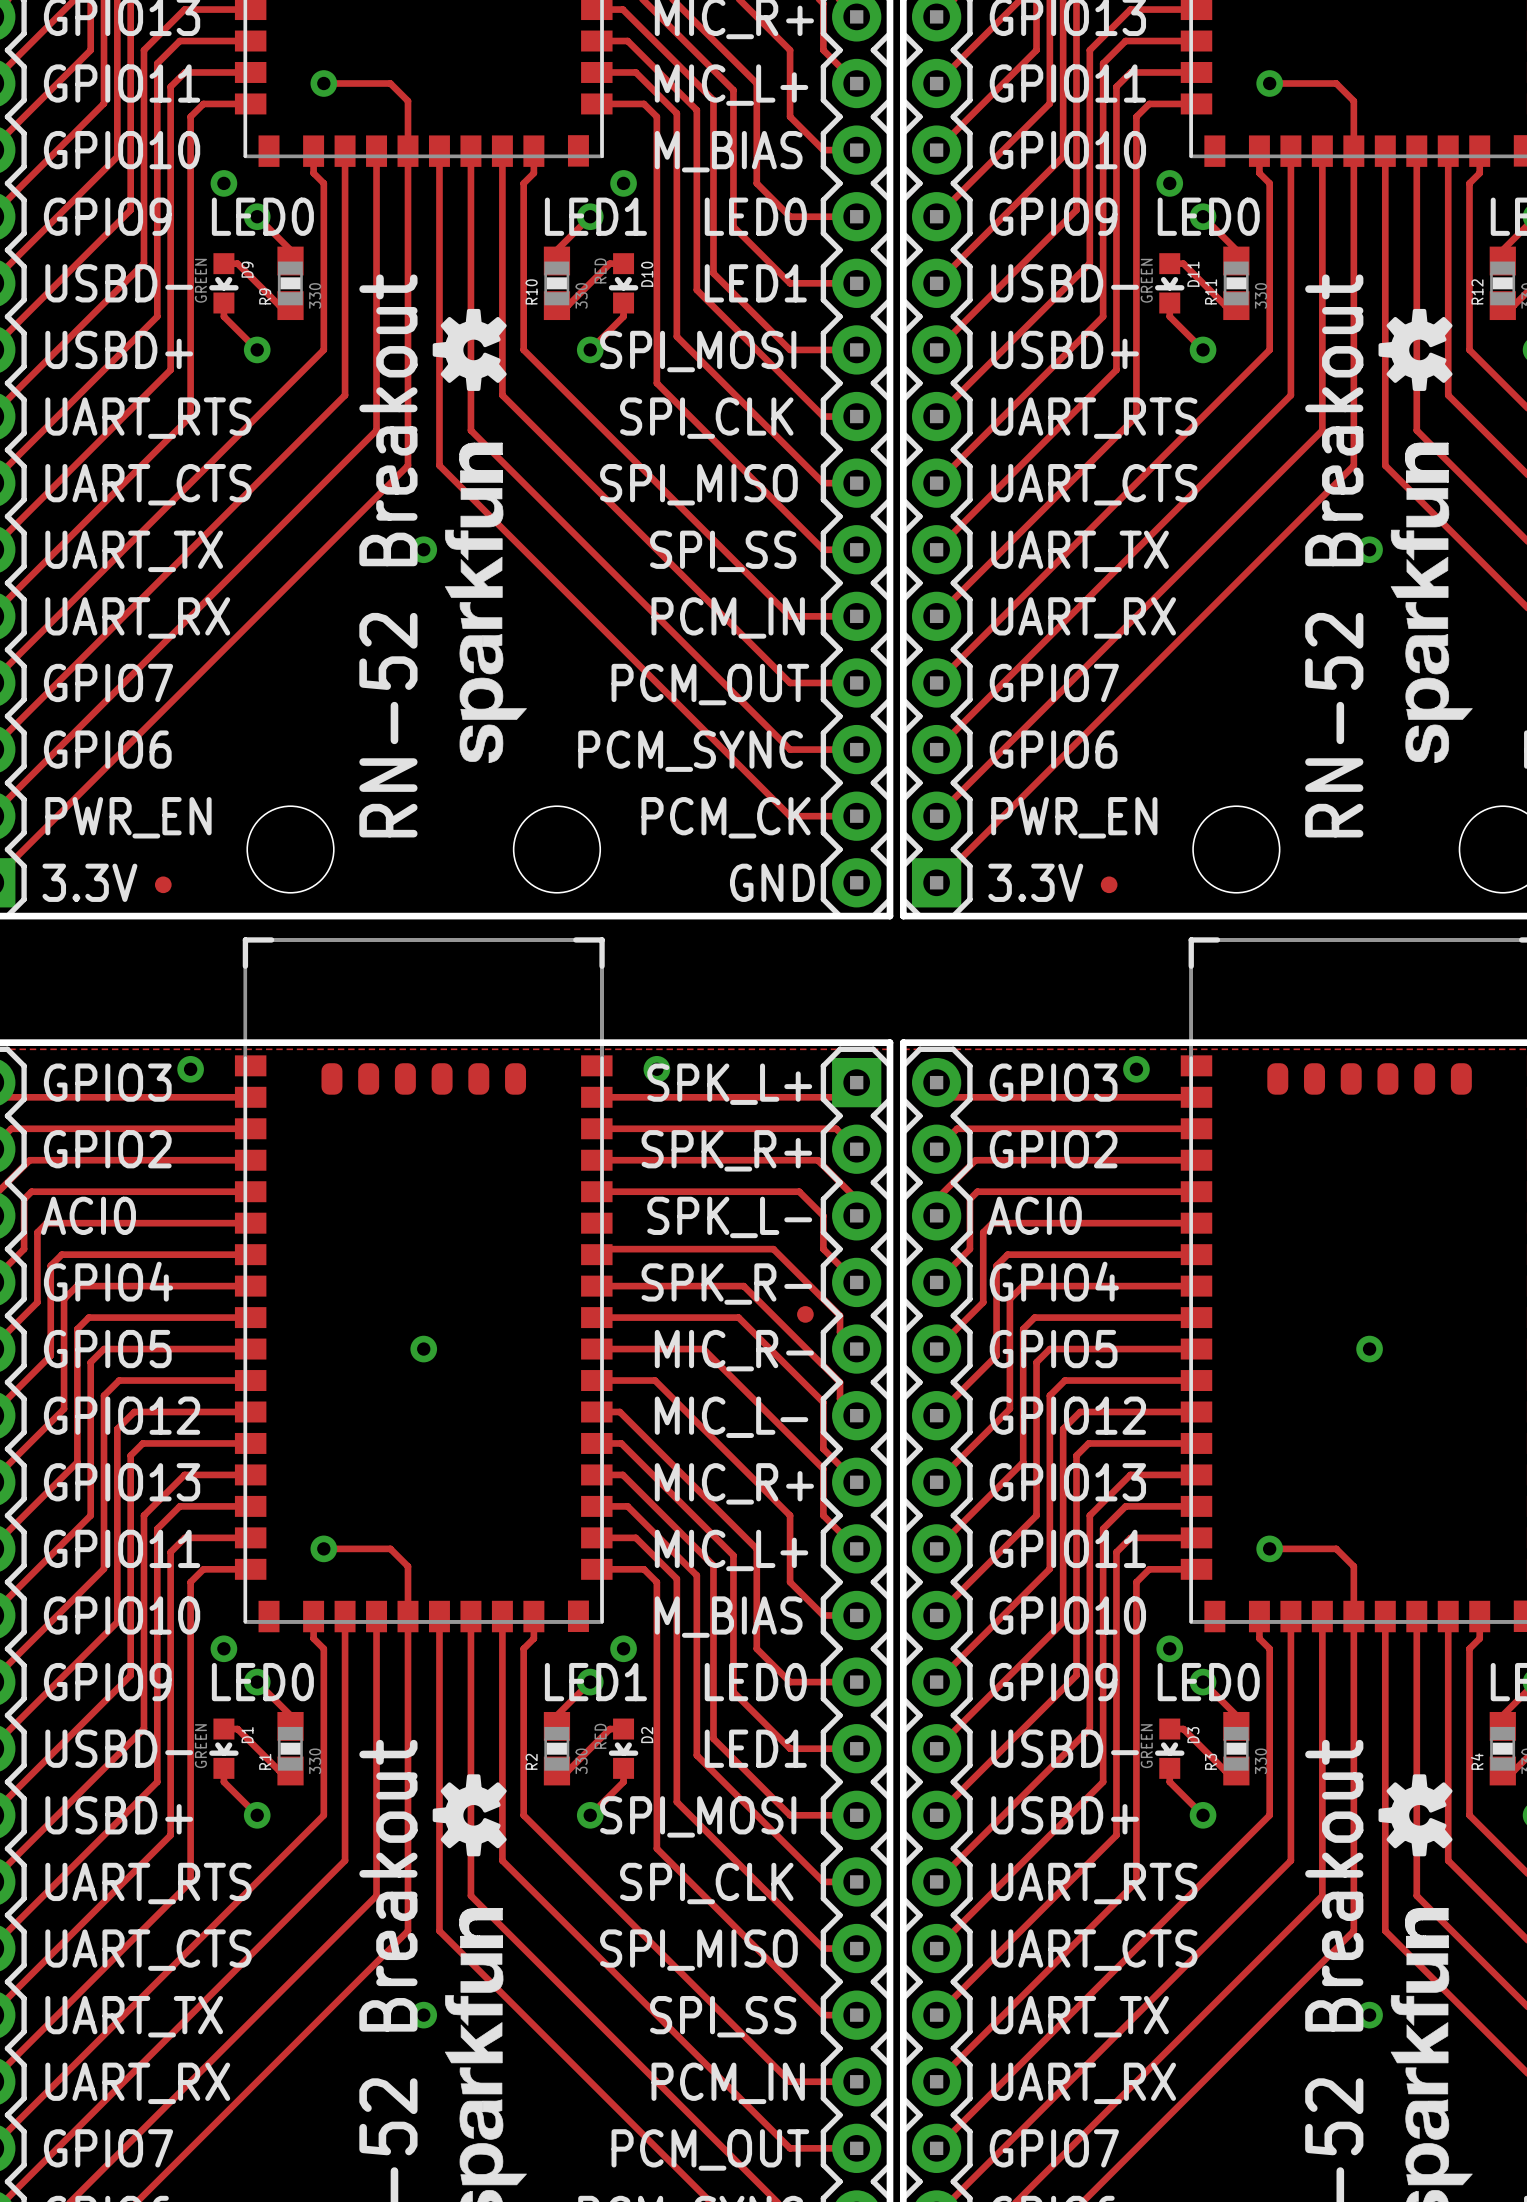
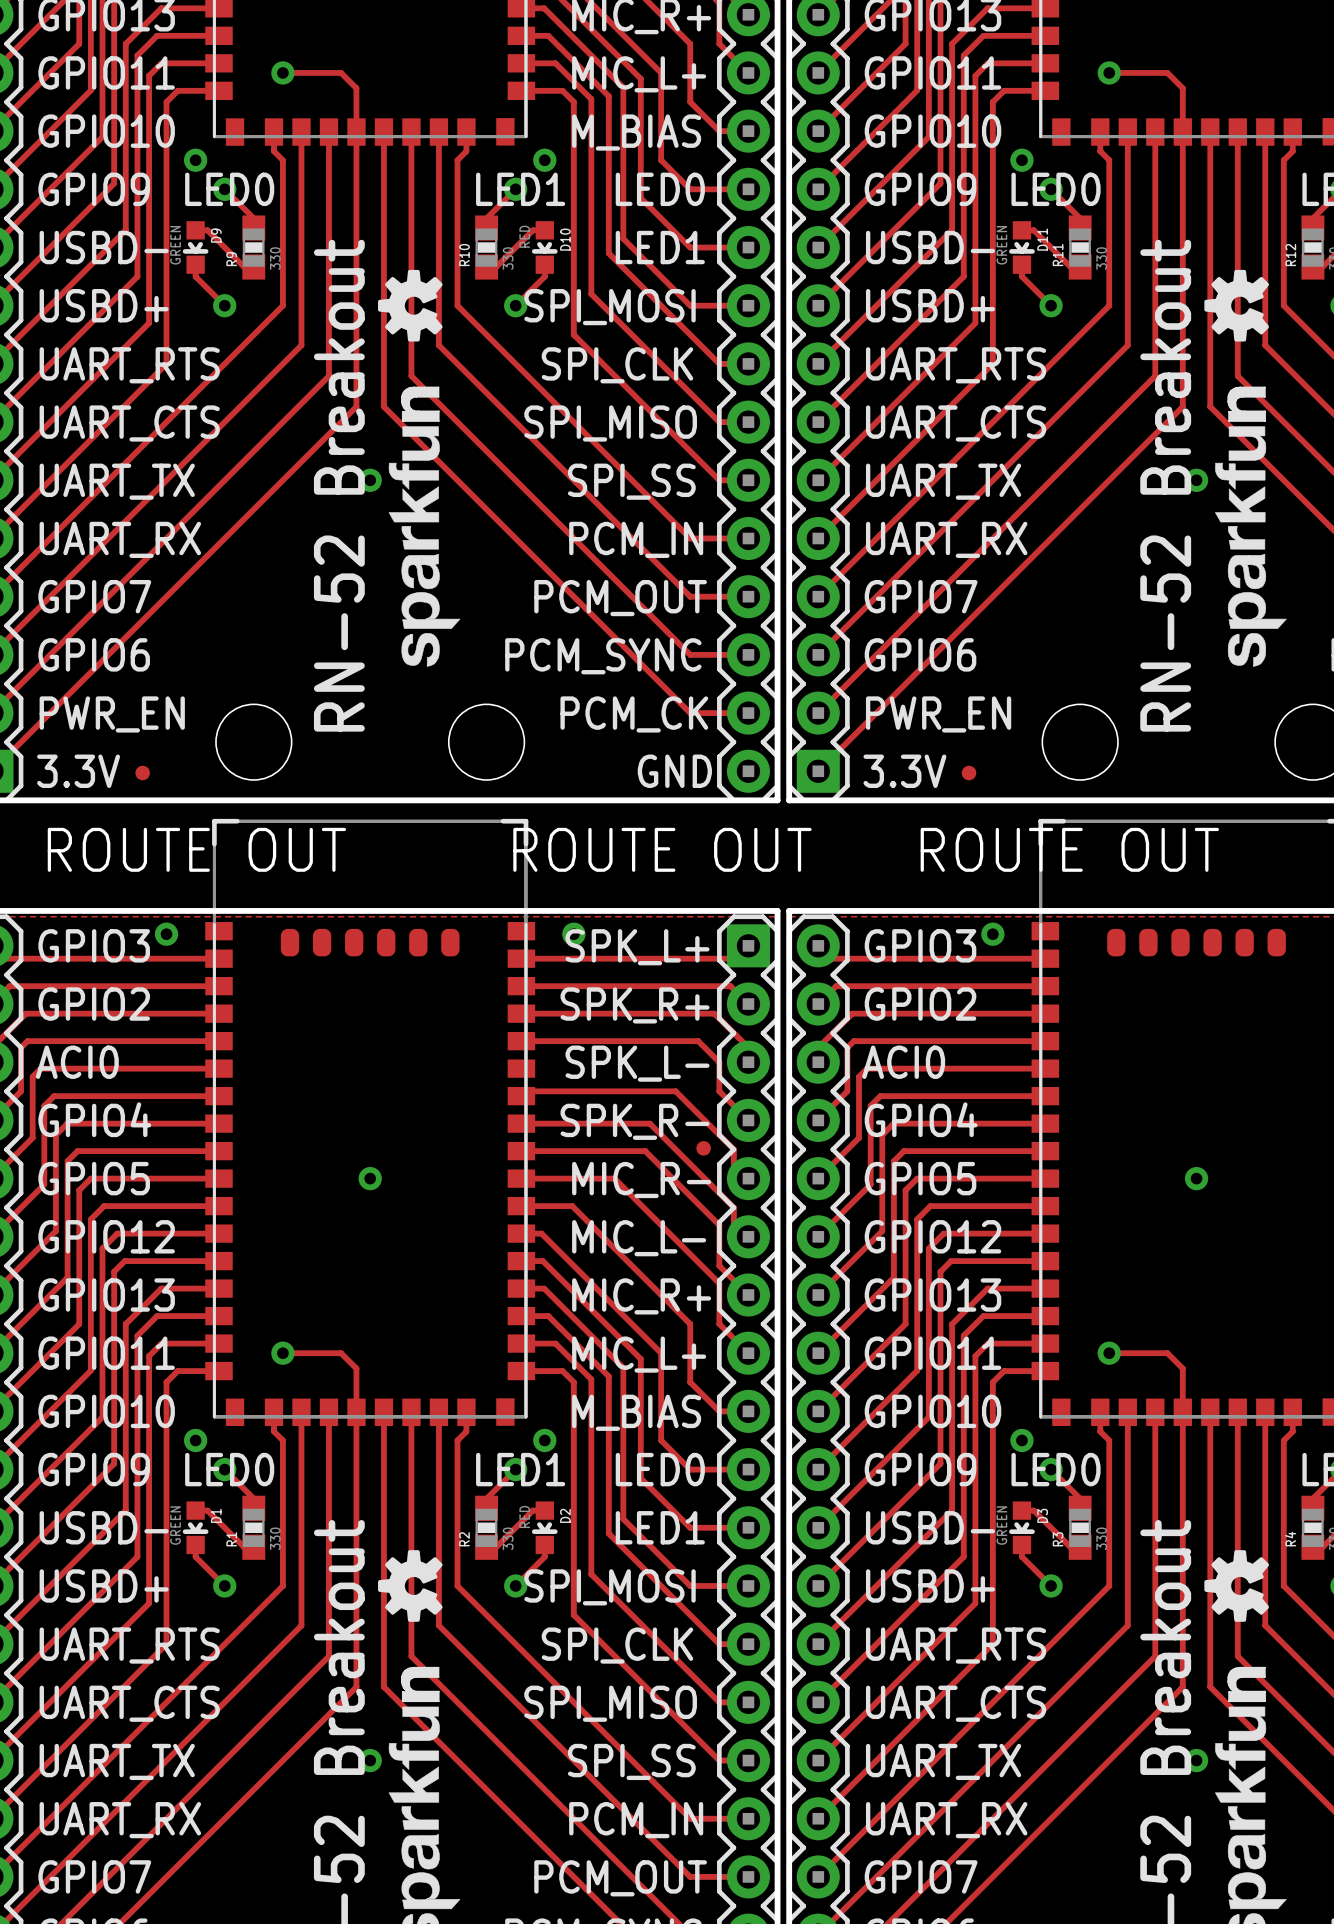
text: none -> ROUTE OUT (196, 849)
text: none -> ROUTE OUT (662, 849)
text: none -> ROUTE OUT (1069, 849)

